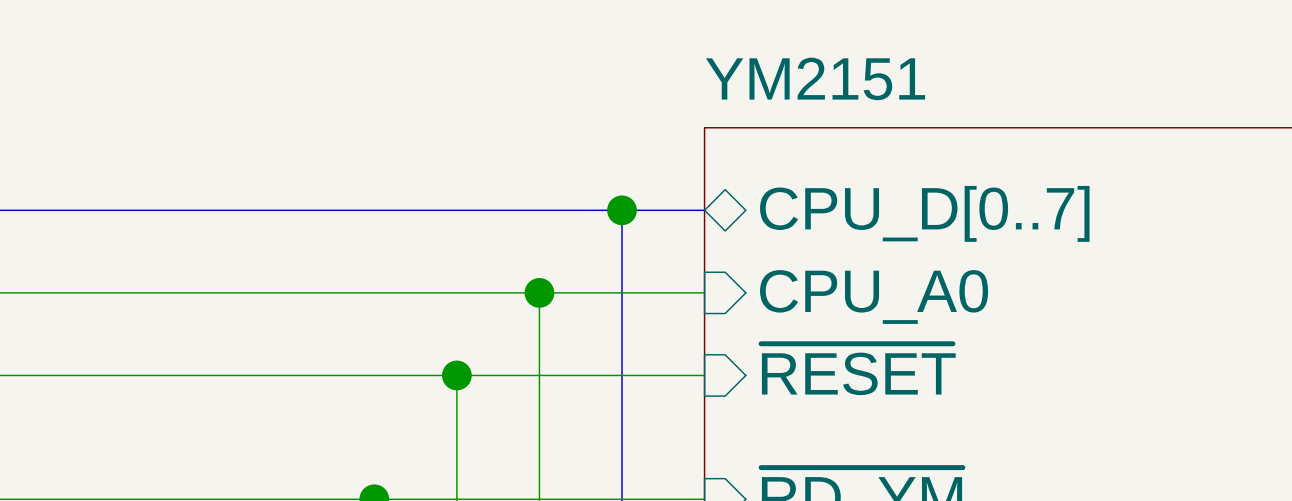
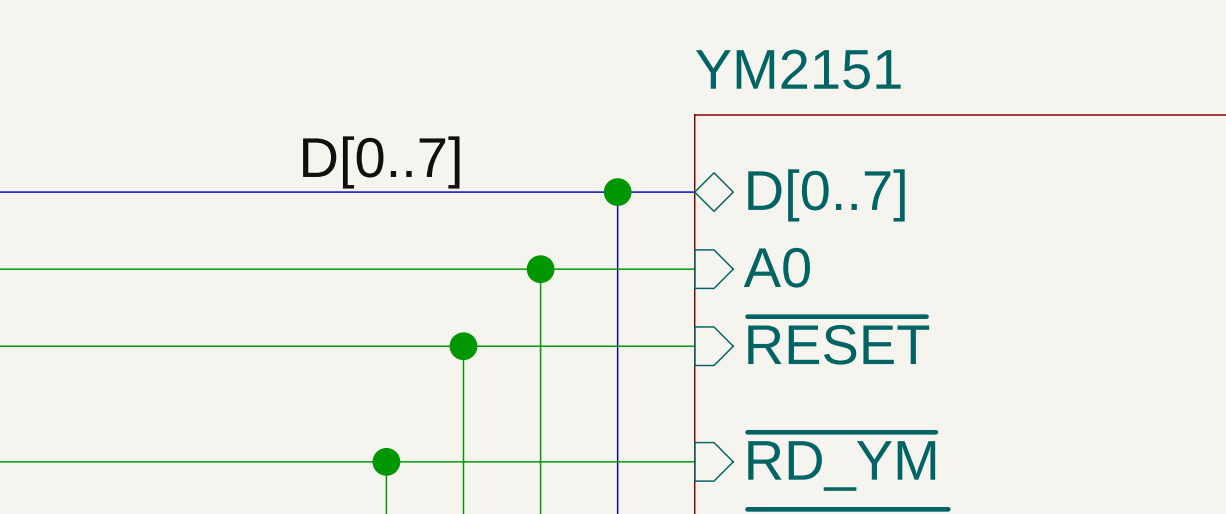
label: none -> D[0..7] (381, 162)
sheet pin: CPU_D[0..7] (924, 213) -> D[0..7] (826, 195)
sheet pin: CPU_A0 (874, 296) -> A0 (776, 267)

